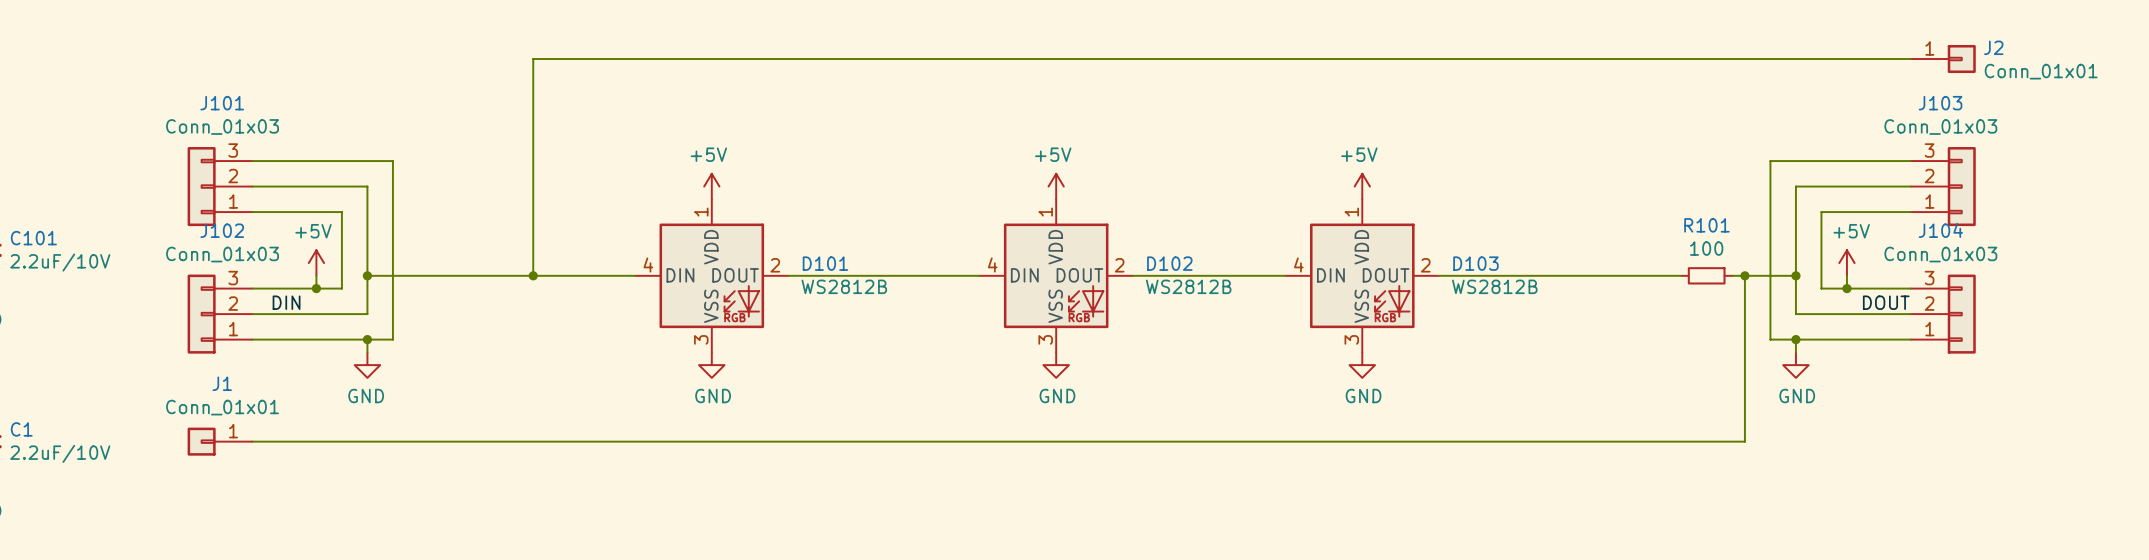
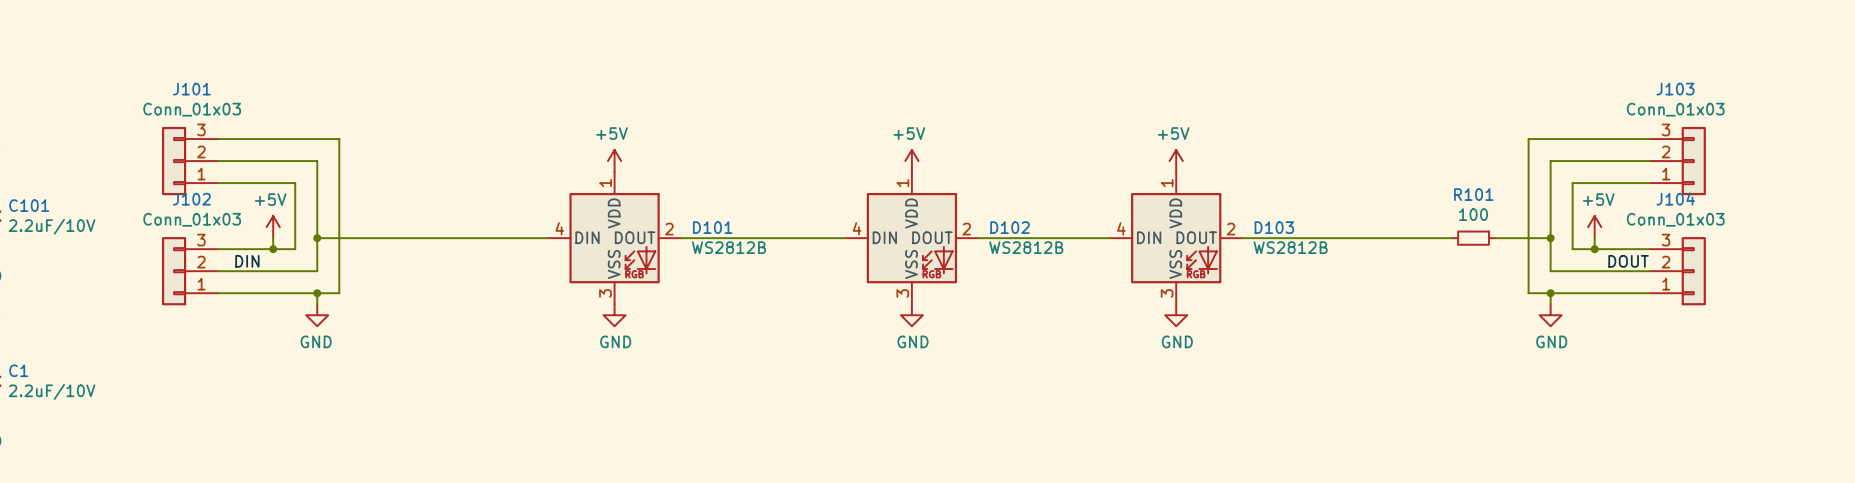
wire: (1910, 59) (533, 59) (533, 275) -> none
J2: Conn_01x01 (1943, 59) -> none
junction: (533, 275) -> none
wire: (1744, 275) (1744, 441) (252, 441) -> none
junction: (1744, 275) -> none
J1: Conn_01x01 (220, 441) -> none

